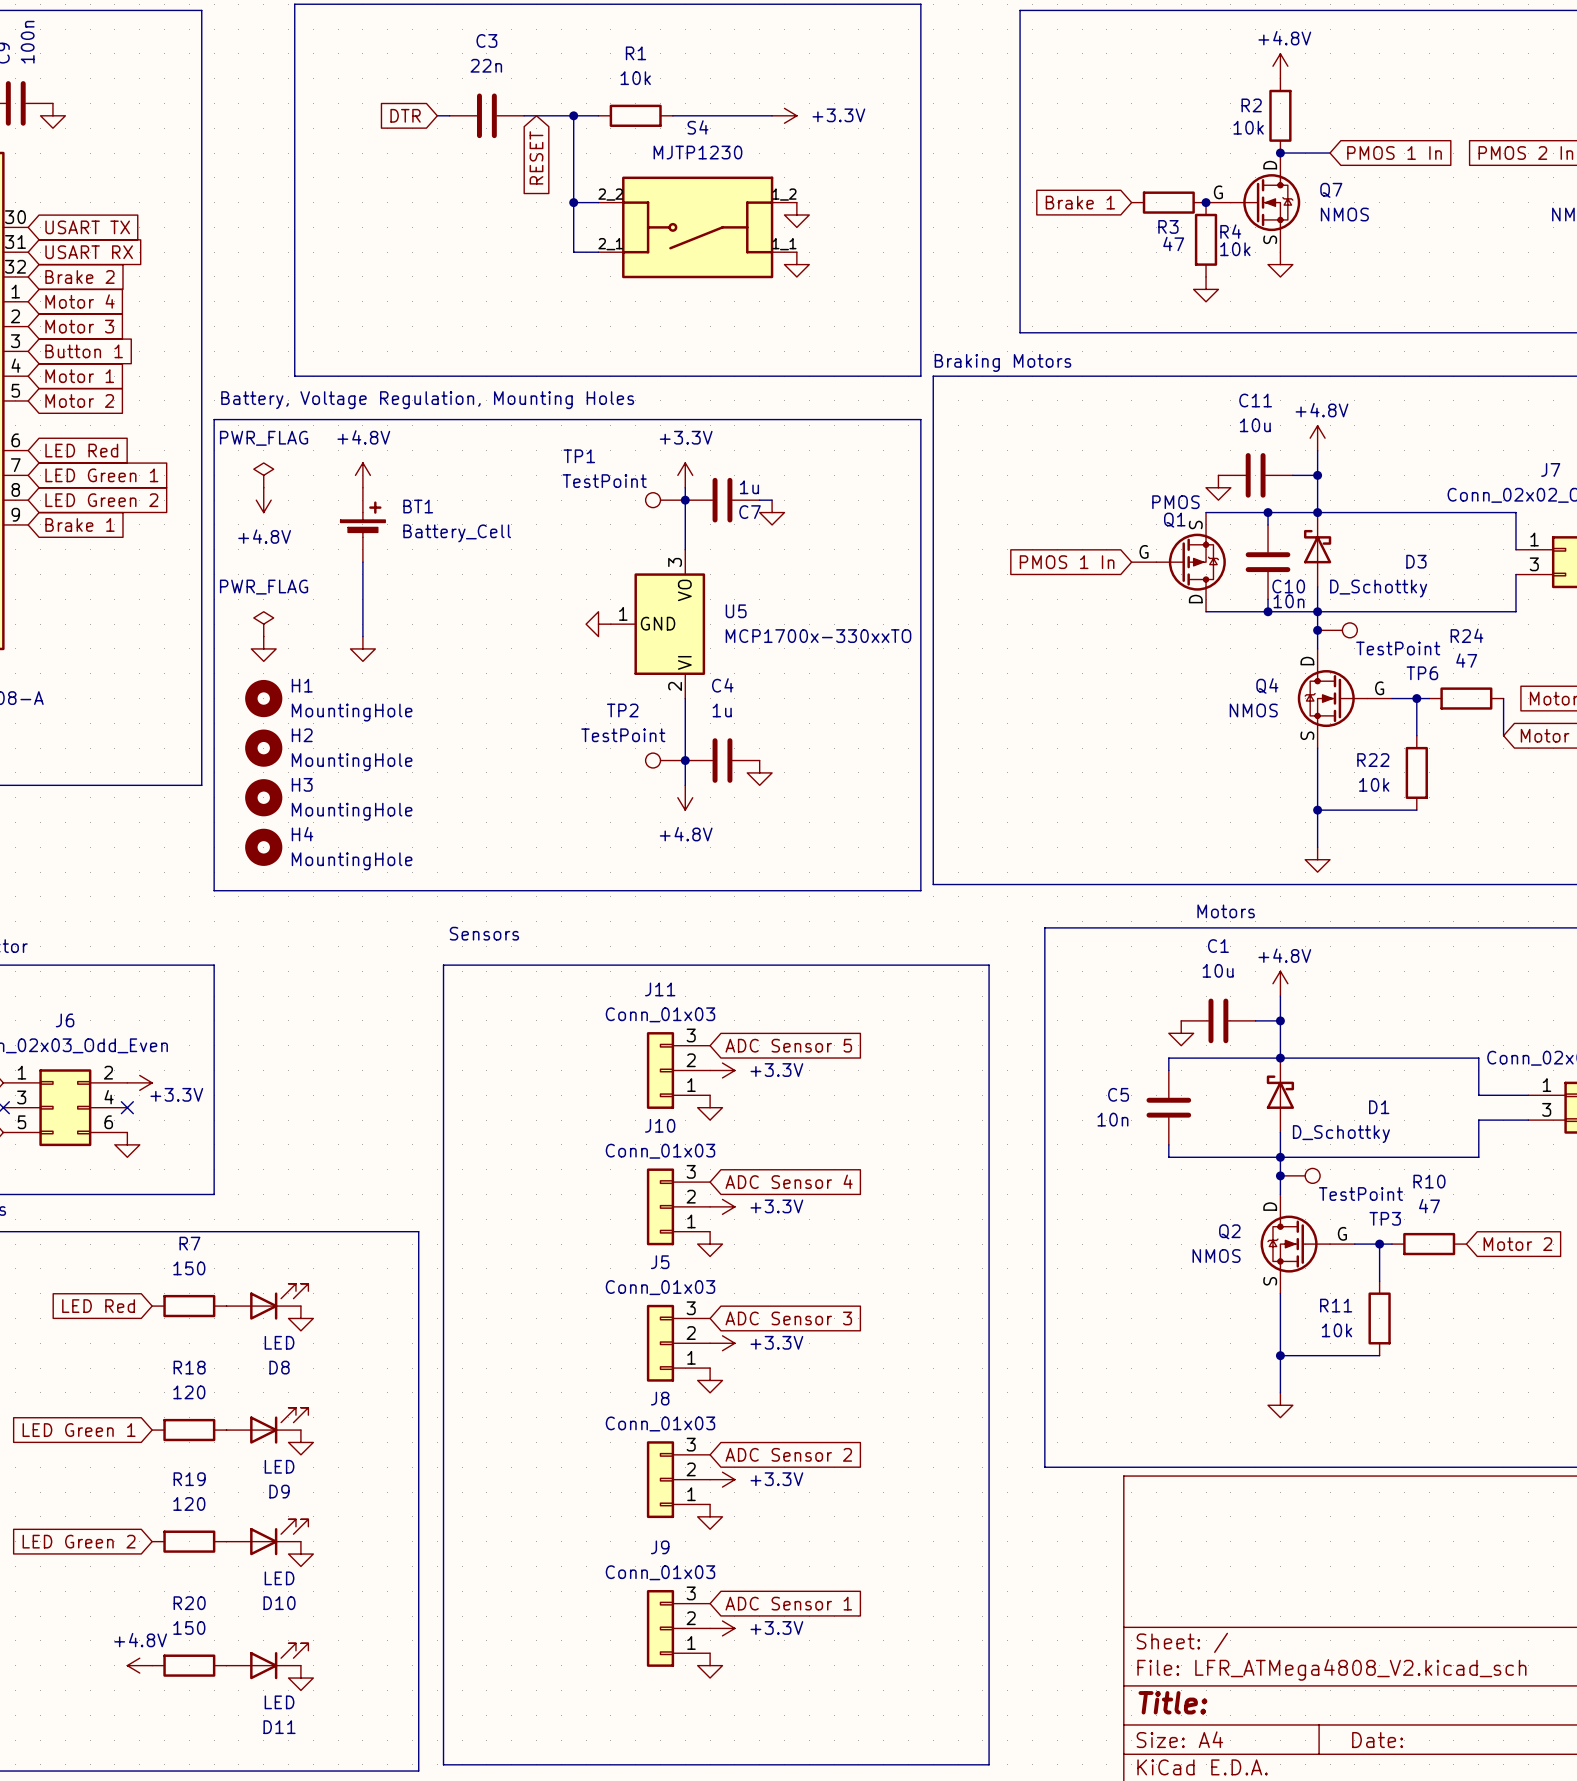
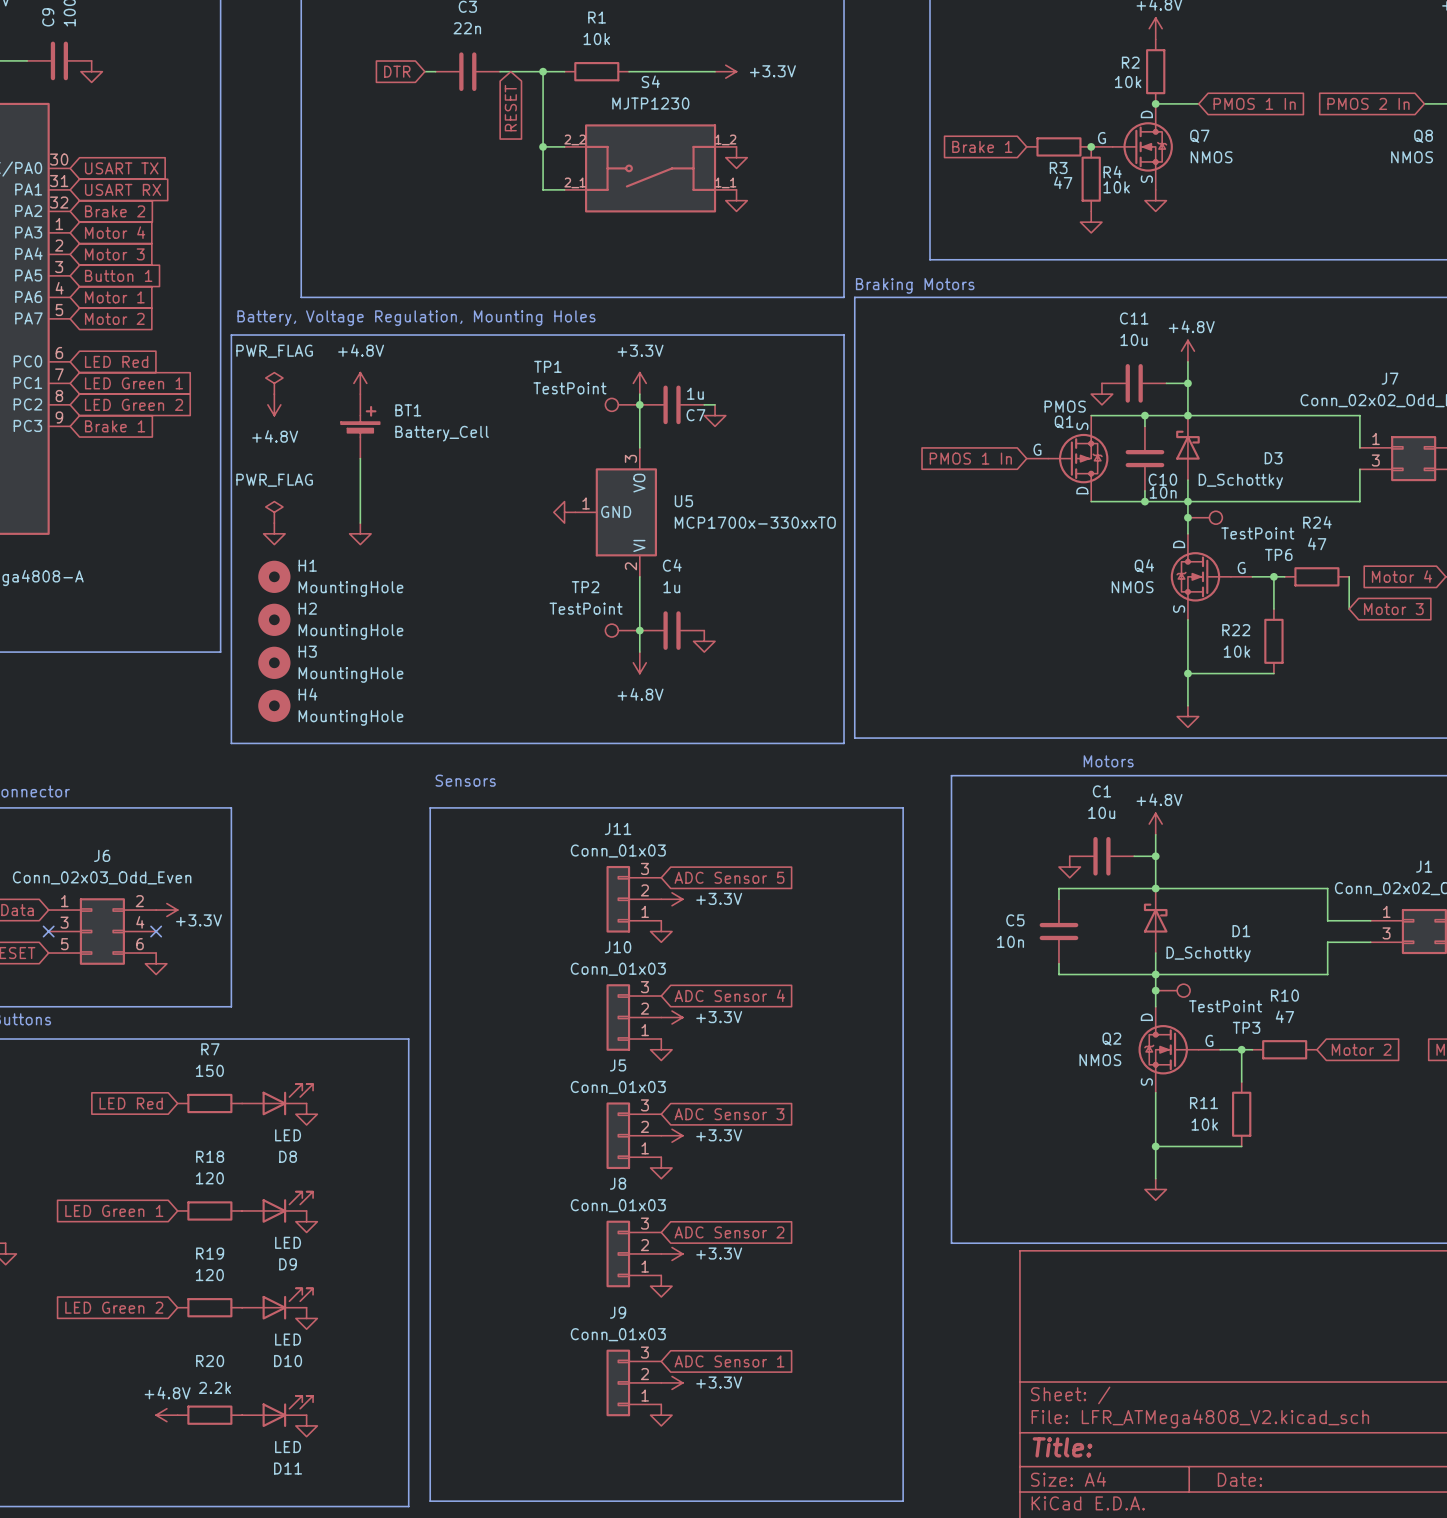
R20 value: 150 (189, 1627) -> 2.2k (214, 1387)

